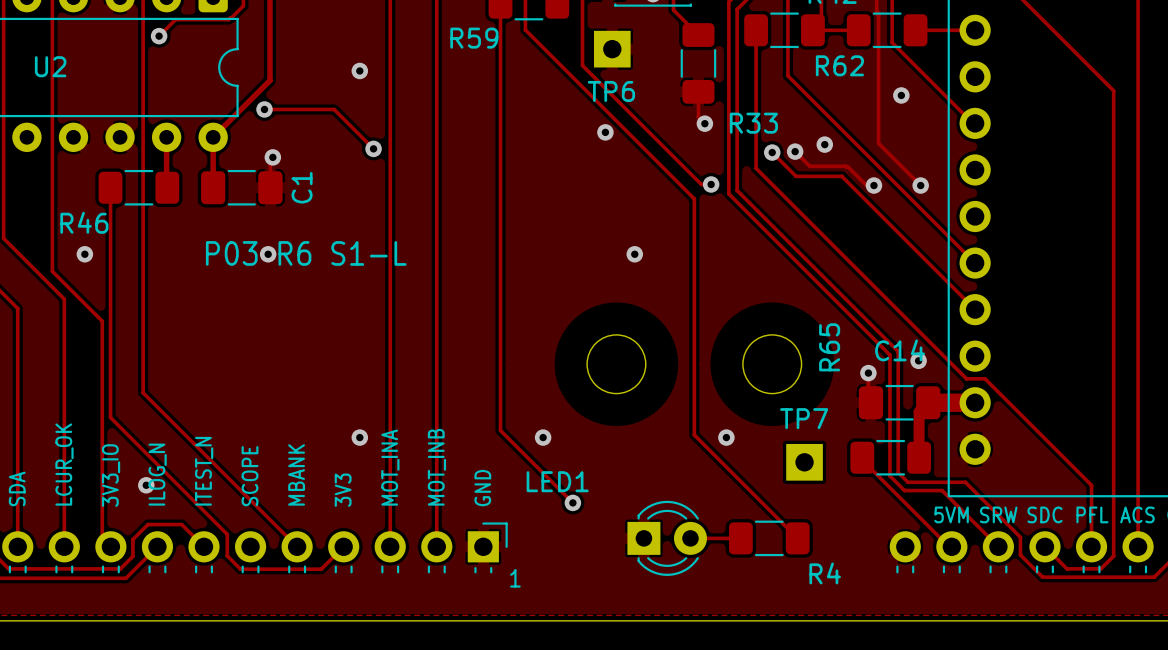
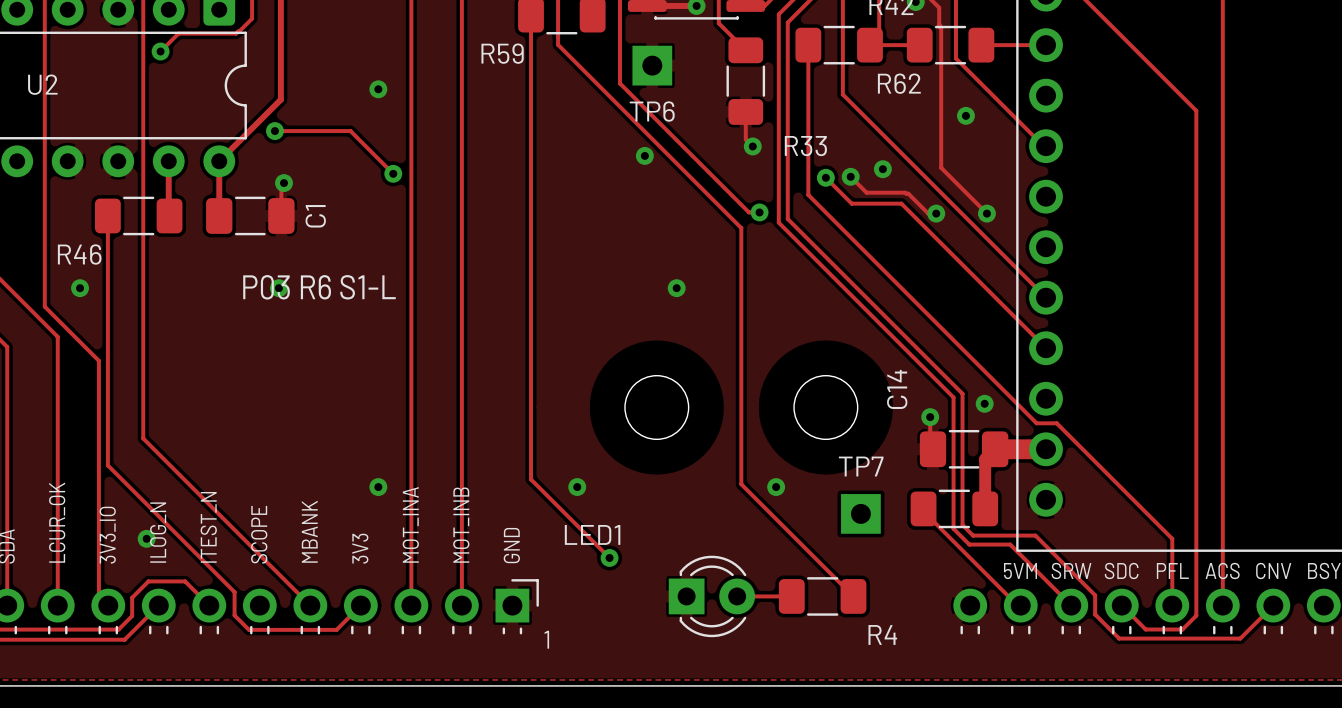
R65 name: R65 (829, 347) -> none
C14 name rotation: 0° (900, 350) -> 90° counterclockwise (897, 389)

